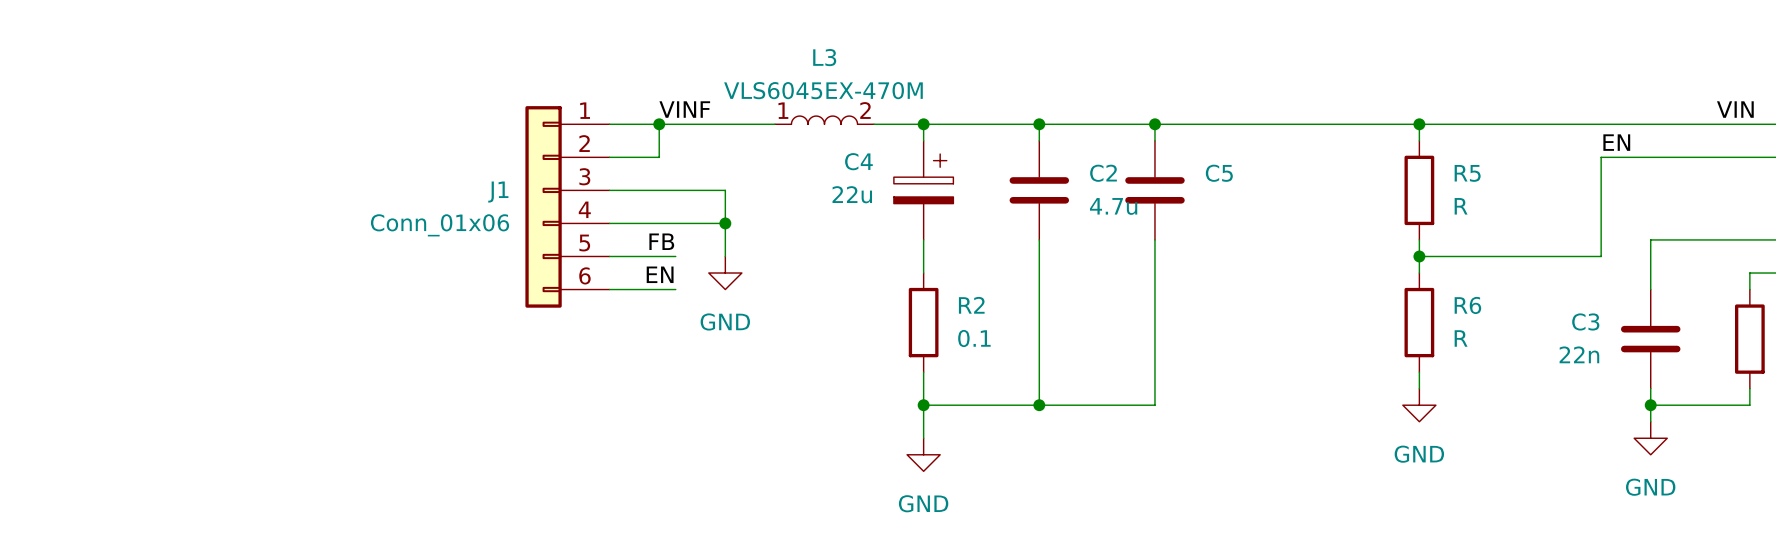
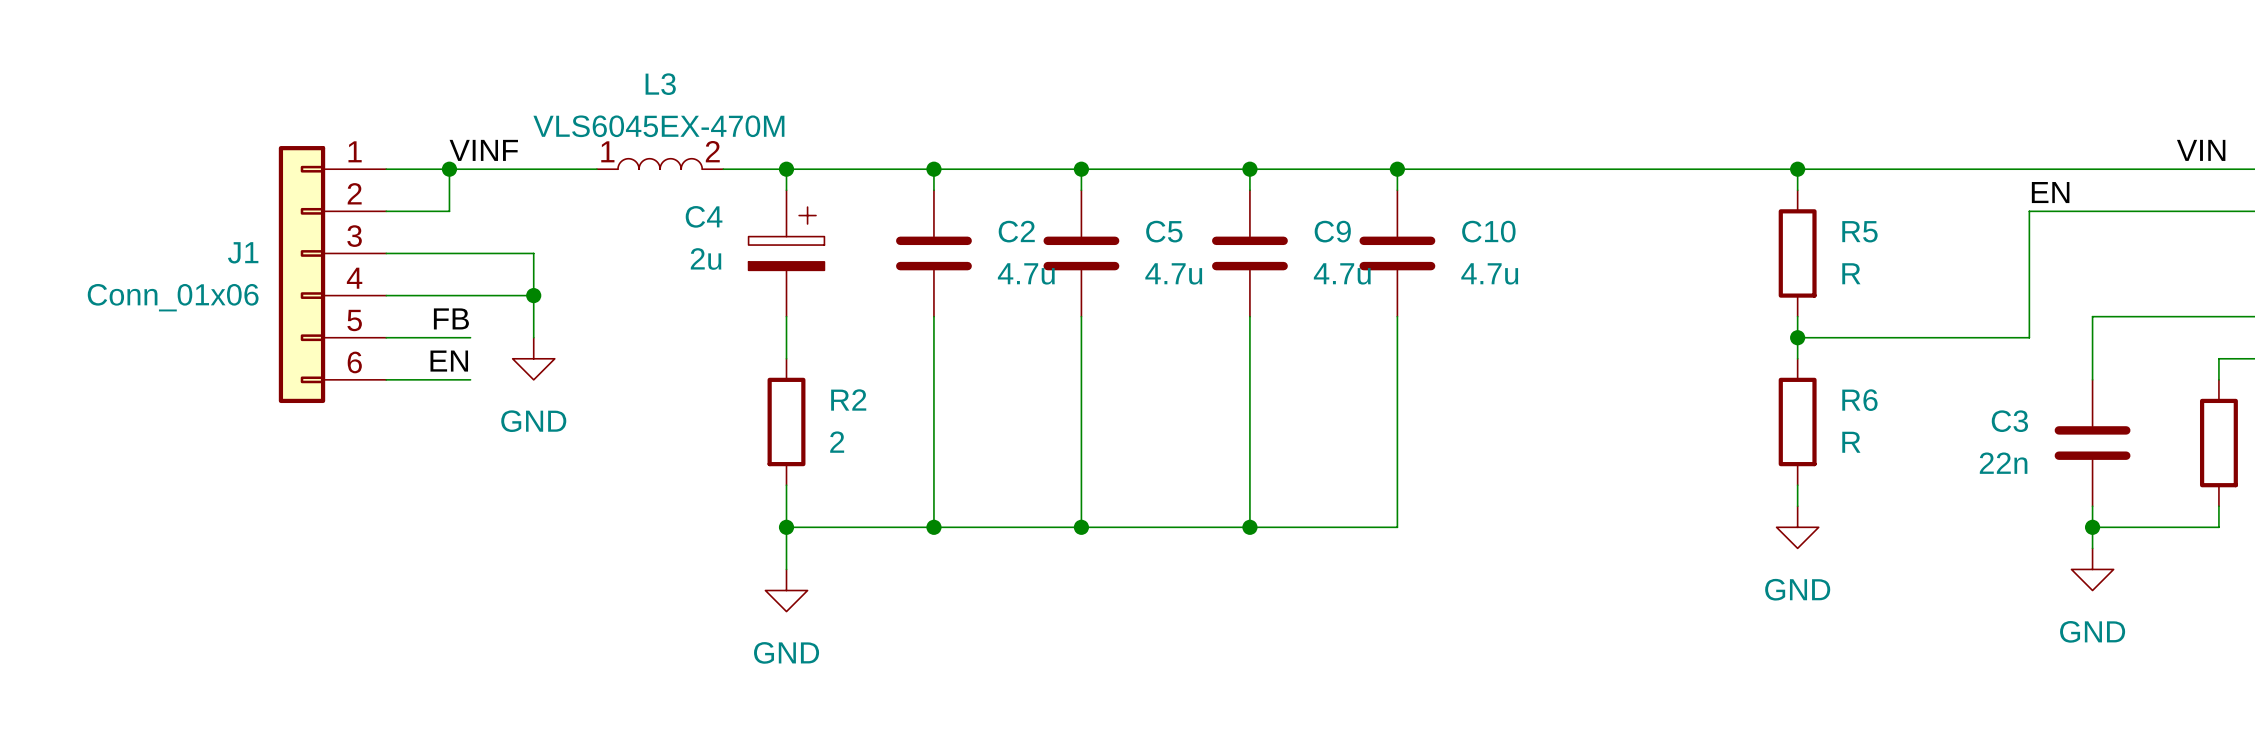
label position: VINF (684, 109) -> VINF (483, 150)
L3 position: (824, 120) -> (660, 163)
wire: none -> (386, 169) (596, 169)
junction: none -> (449, 169)
wire: (659, 124) (659, 157) (609, 157) -> (449, 169) (449, 211) (386, 211)
junction position: (659, 124) -> (786, 169)
junction: none -> (933, 169)
wire: none -> (976, 169) (1102, 169)
junction: none -> (1081, 169)
wire: (923, 124) (923, 140) -> (786, 169) (786, 190)
junction: (923, 124) -> none
wire: none -> (1249, 169) (1249, 190)
junction: none -> (1249, 169)
wire: (1039, 124) (1039, 140) -> (933, 169) (933, 190)
junction: (1039, 124) -> none
wire: none -> (1397, 169) (1397, 190)
junction: none -> (1397, 169)
wire: (1154, 124) (1154, 140) -> (1081, 169) (1081, 190)
junction: (1154, 124) -> none
wire: (609, 190) (725, 190) (725, 256) -> (386, 253) (533, 253) (533, 337)
C4 position: (923, 190) -> (786, 253)
C9: none -> 4.7u (1249, 253)
C2 position: (1039, 190) -> (933, 253)
C10: none -> 4.7u (1397, 253)
C5 position: (1154, 190) -> (1081, 253)
C4 value: 22u (852, 194) -> 2u (706, 258)
J1 position: (567, 206) -> (332, 274)
C5 value: none -> 4.7u (1173, 273)
junction: none -> (533, 295)
wire: (609, 223) (725, 223) -> (386, 295) (533, 295)
junction: (725, 223) -> none
wire: none -> (1081, 316) (1081, 527)
wire: (923, 239) (923, 273) -> (786, 316) (786, 358)
wire: none -> (1249, 316) (1249, 527)
wire: (1039, 239) (1039, 405) -> (933, 316) (933, 527)
wire: (1154, 239) (1154, 405) (1105, 405) -> (1397, 316) (1397, 527)
label position: FB (661, 241) -> FB (451, 318)
wire: (609, 256) (675, 256) -> (386, 337) (470, 337)
power symbol: none -> GND (533, 358)
power symbol: GND (725, 273) -> none
label position: EN (660, 274) -> EN (449, 361)
wire: (609, 289) (675, 289) -> (386, 379) (470, 379)
R2 position: (923, 322) -> (786, 421)
R2 value: 0.1 (974, 338) -> 2 (837, 442)
wire: (923, 372) (923, 438) -> (786, 485) (786, 569)
wire: none -> (786, 527) (1165, 527)
junction: none -> (786, 527)
junction: none -> (933, 527)
junction: none -> (1081, 527)
junction: (923, 405) -> none
junction: none -> (1249, 527)
junction: (1039, 405) -> none
power symbol: none -> GND (786, 590)
power symbol: GND (923, 454) -> none

